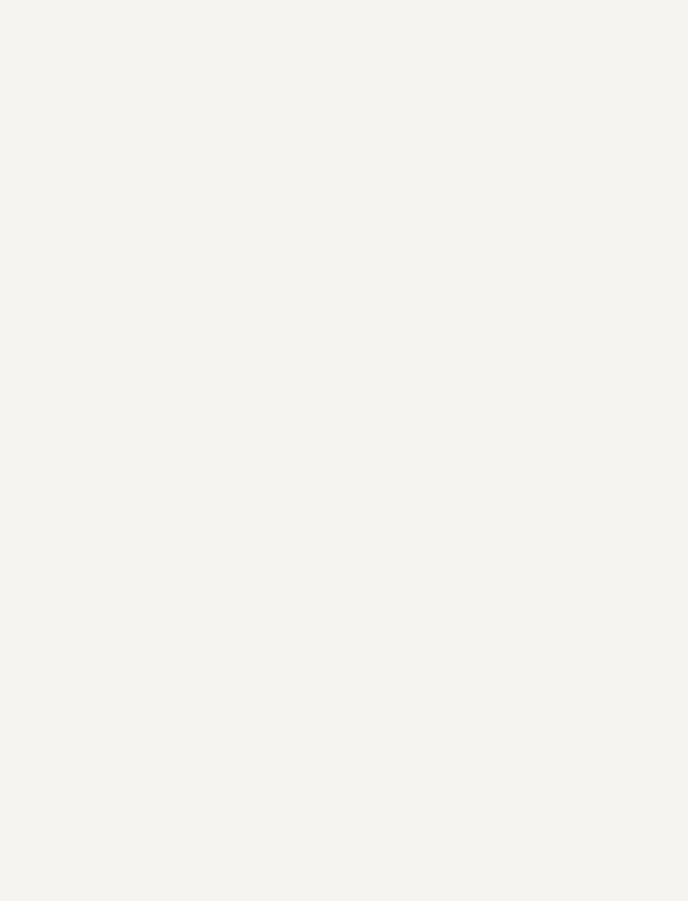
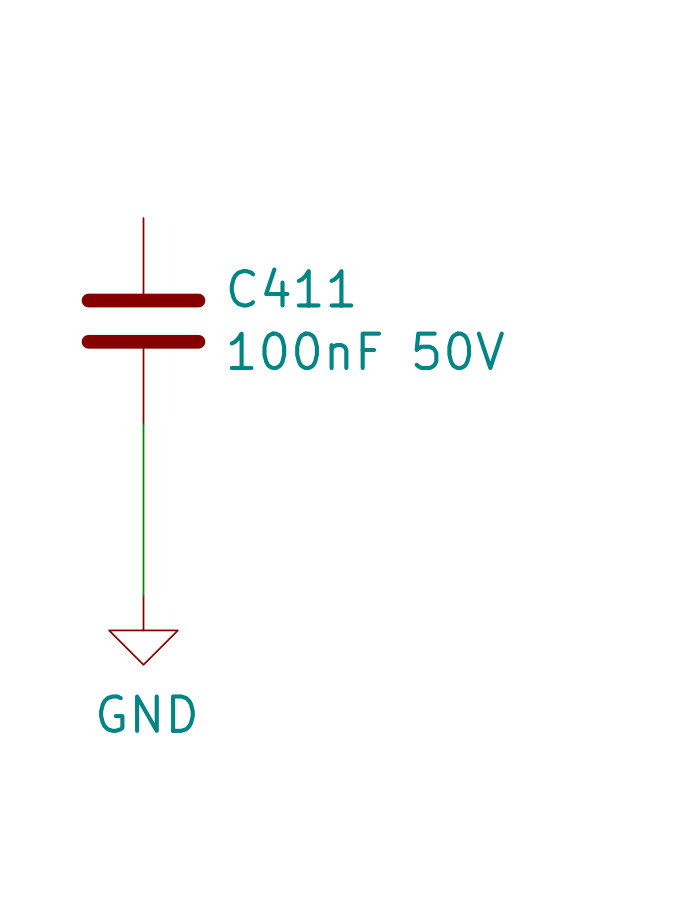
C411: none -> 100nF 50V (143, 321)
wire: none -> (143, 424) (143, 596)
power symbol: none -> GND (143, 630)

